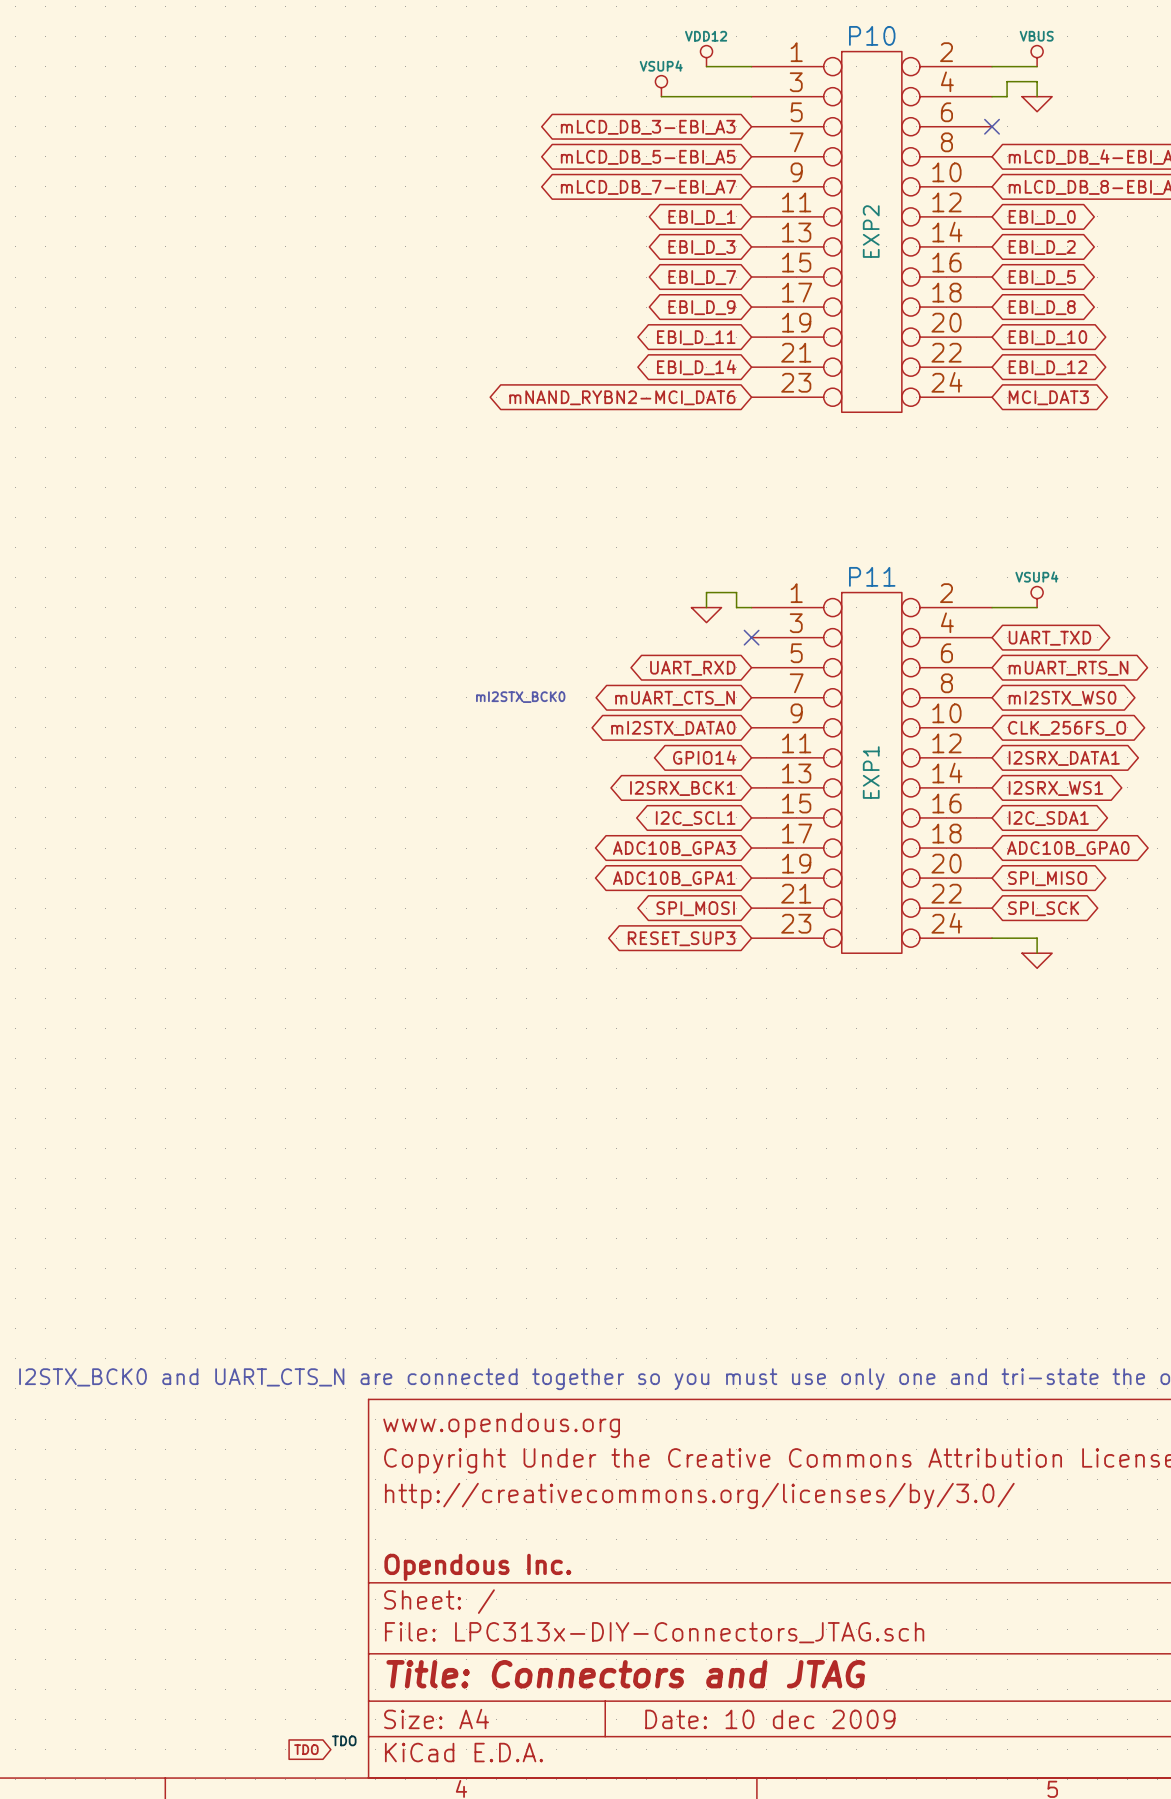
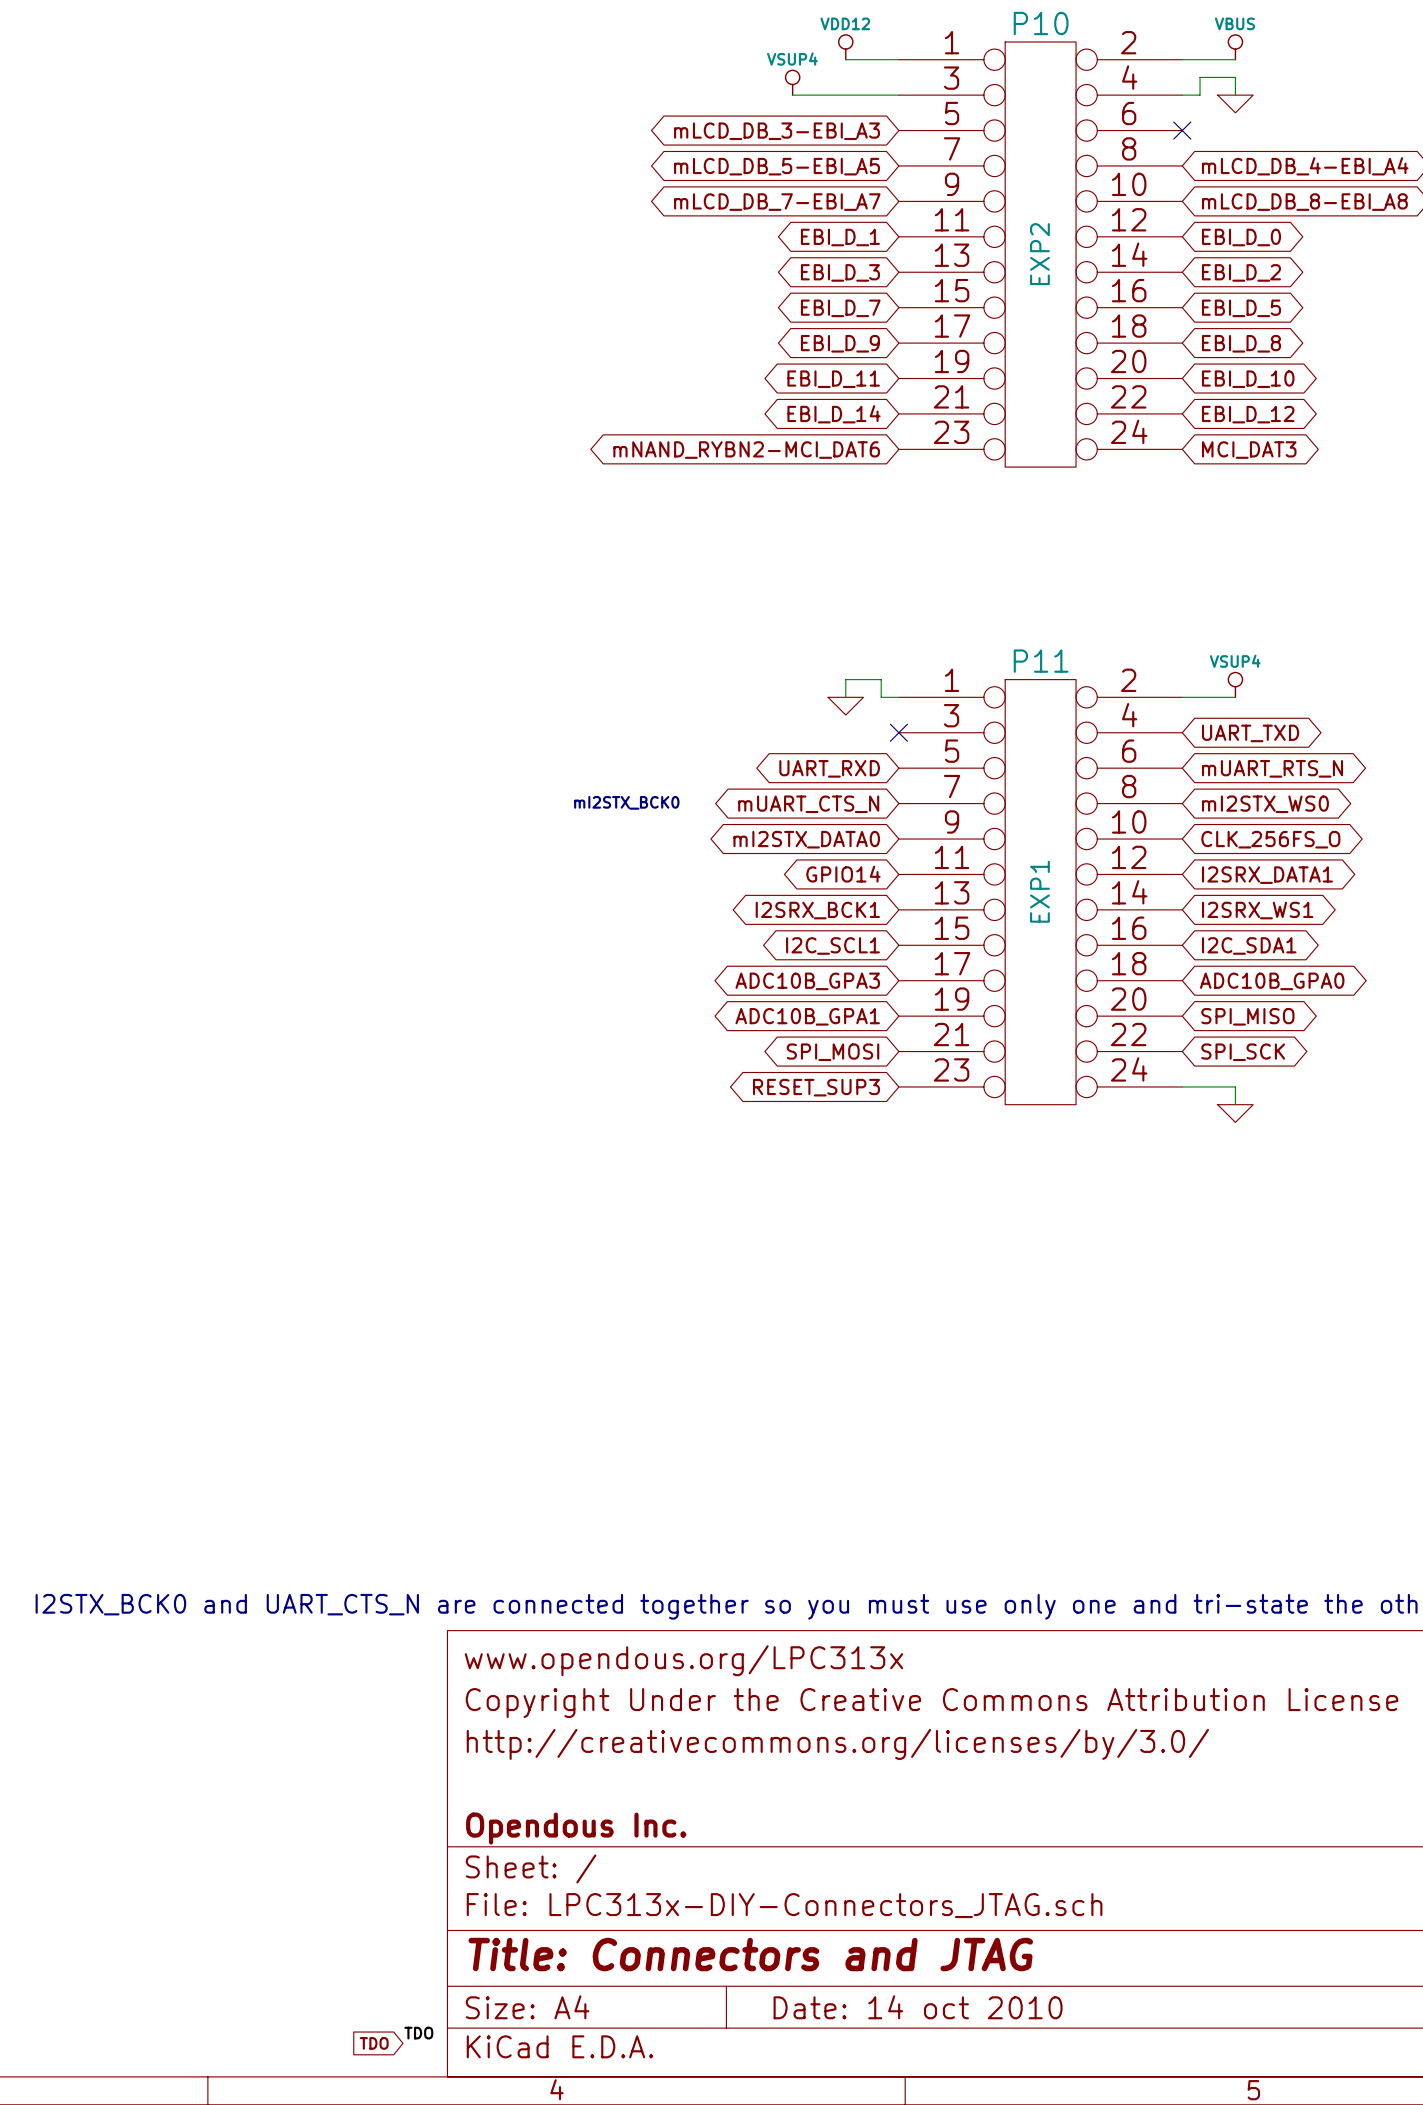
title block: www.opendous.org (501, 1425) -> www.opendous.org/LPC313x (683, 1660)
title block: Date: 10 dec 2009 (770, 1719) -> Date: 14 oct 2010 (918, 2007)

